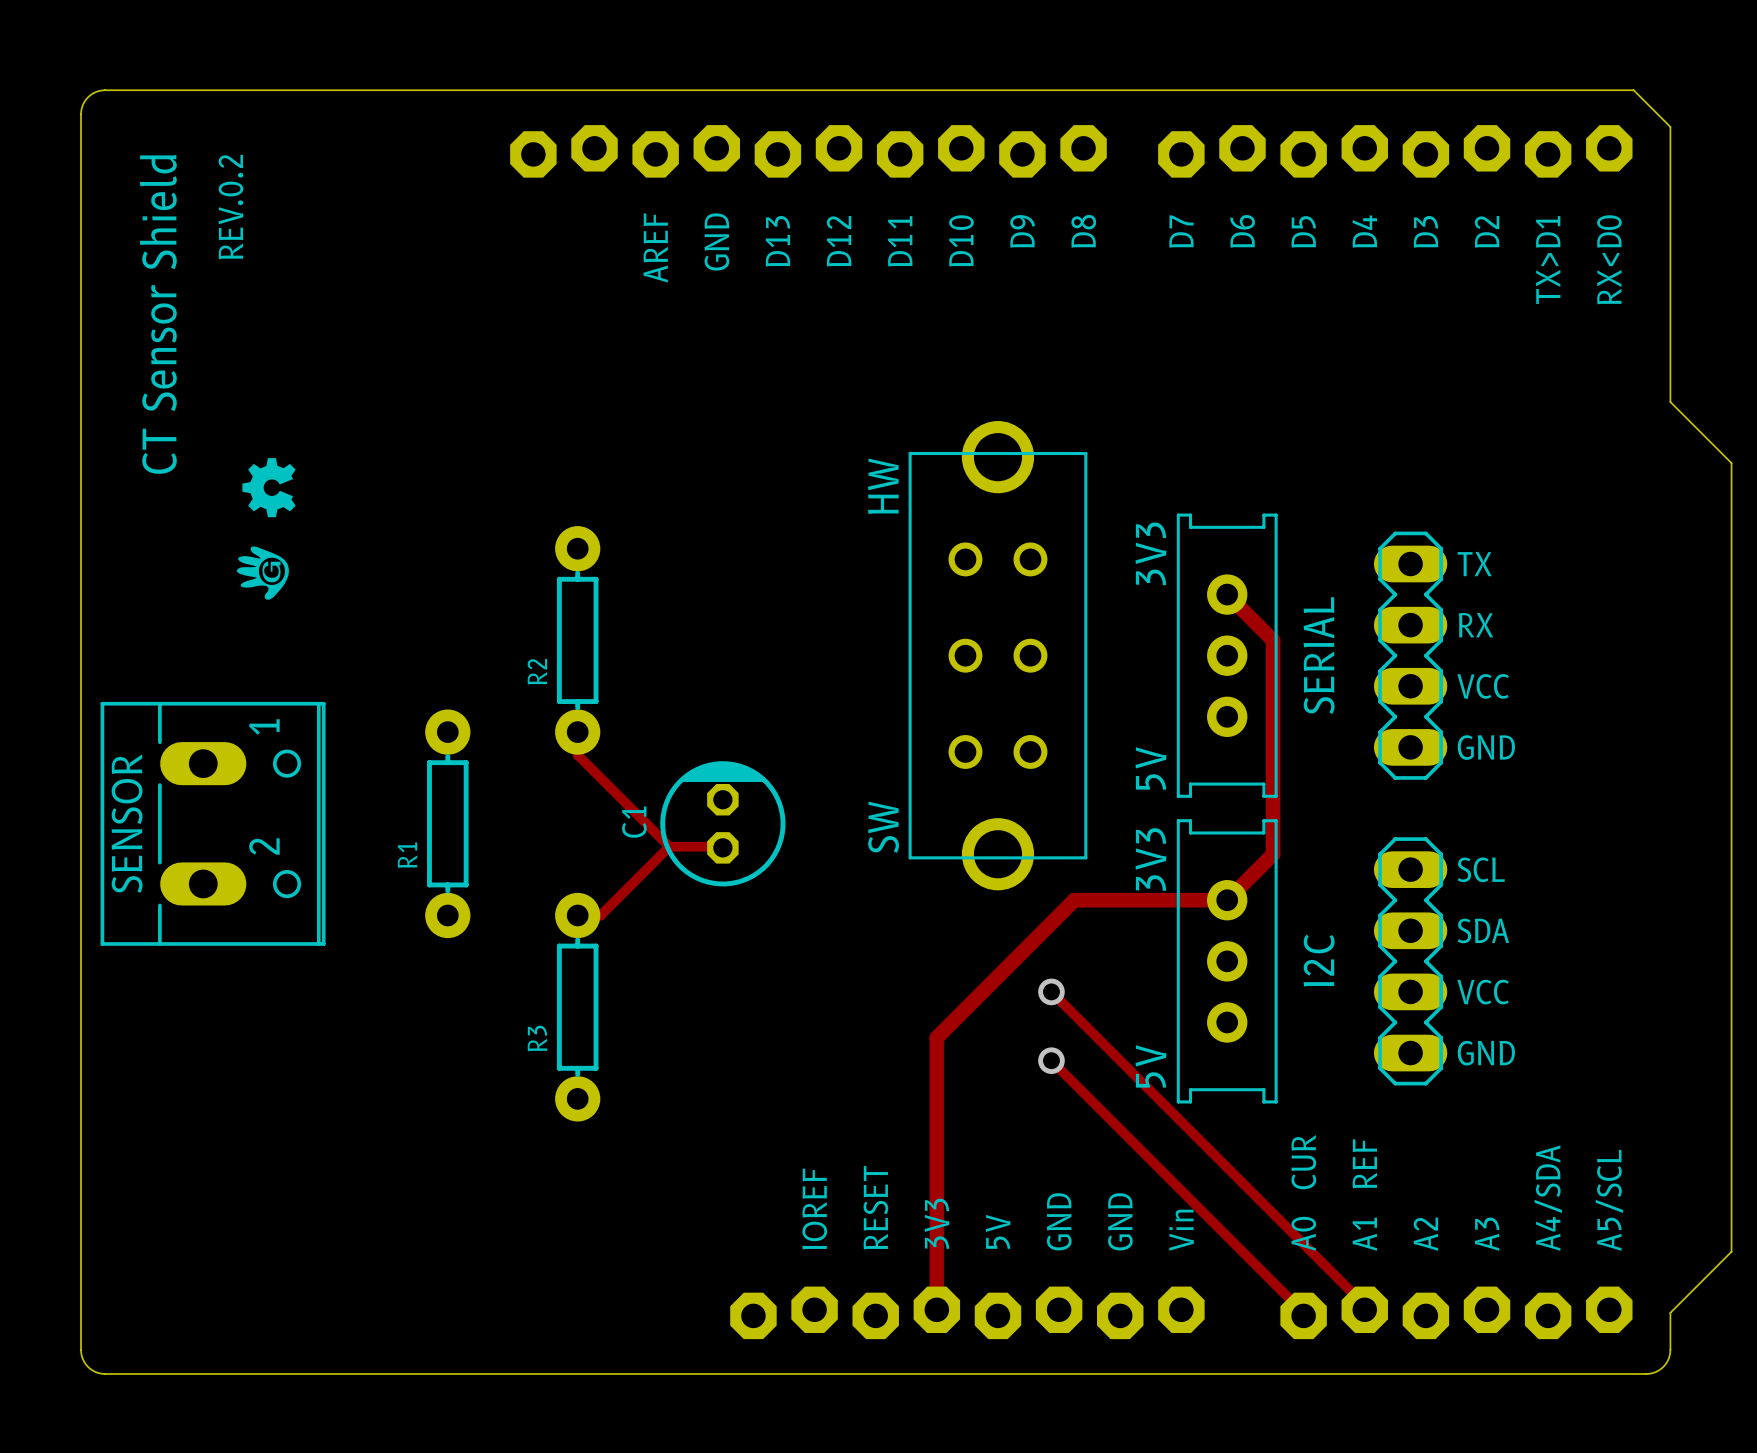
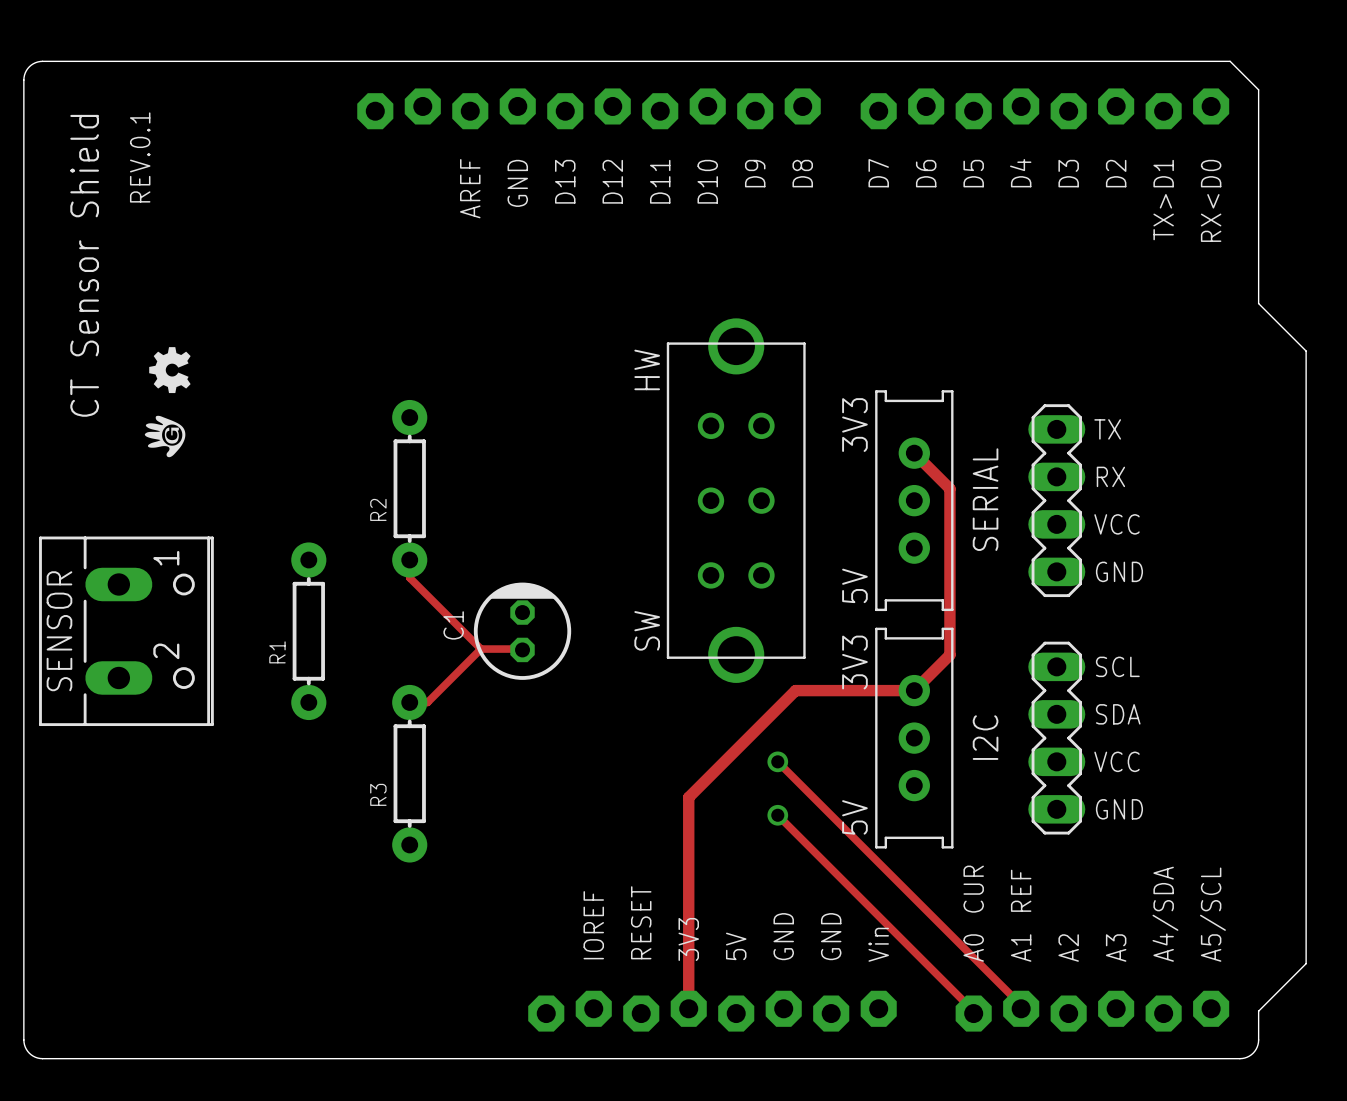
text: REV.0.2 (230, 207) -> REV.0.1 (140, 157)

